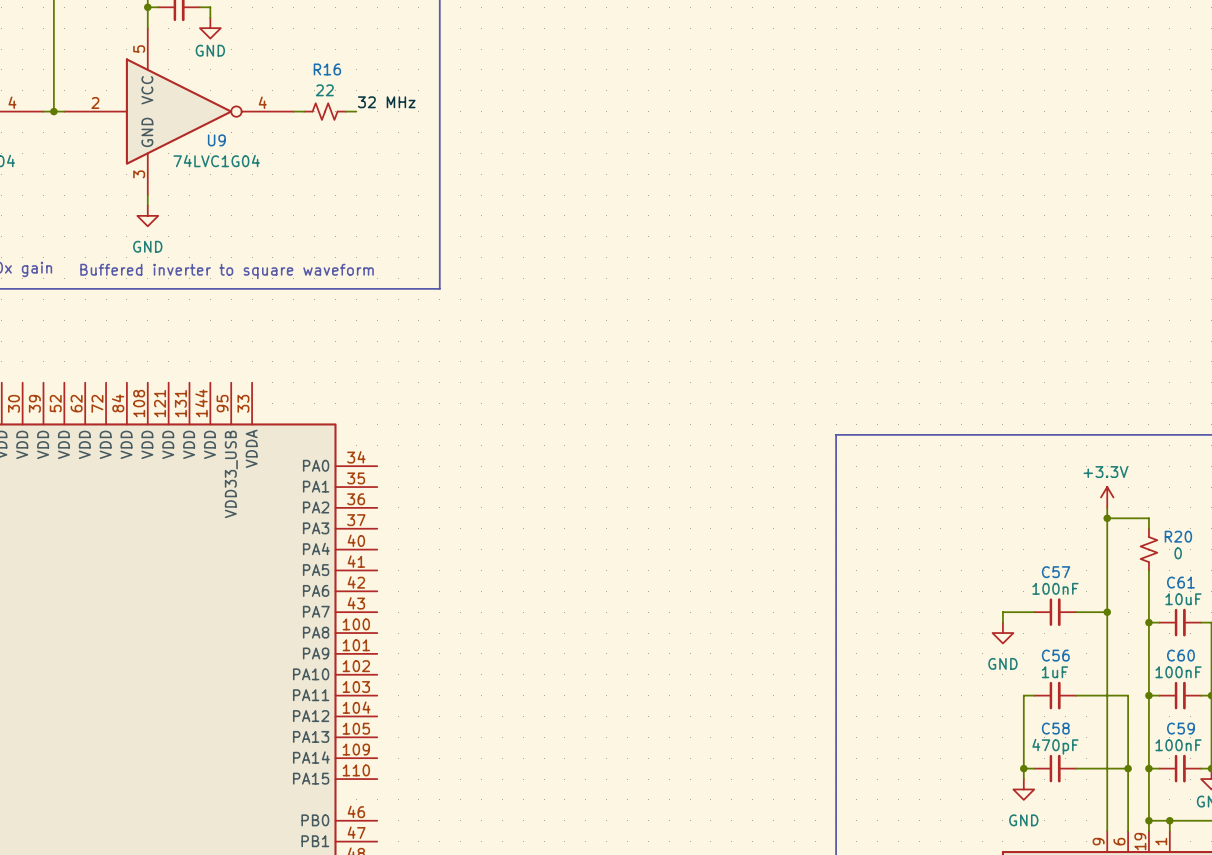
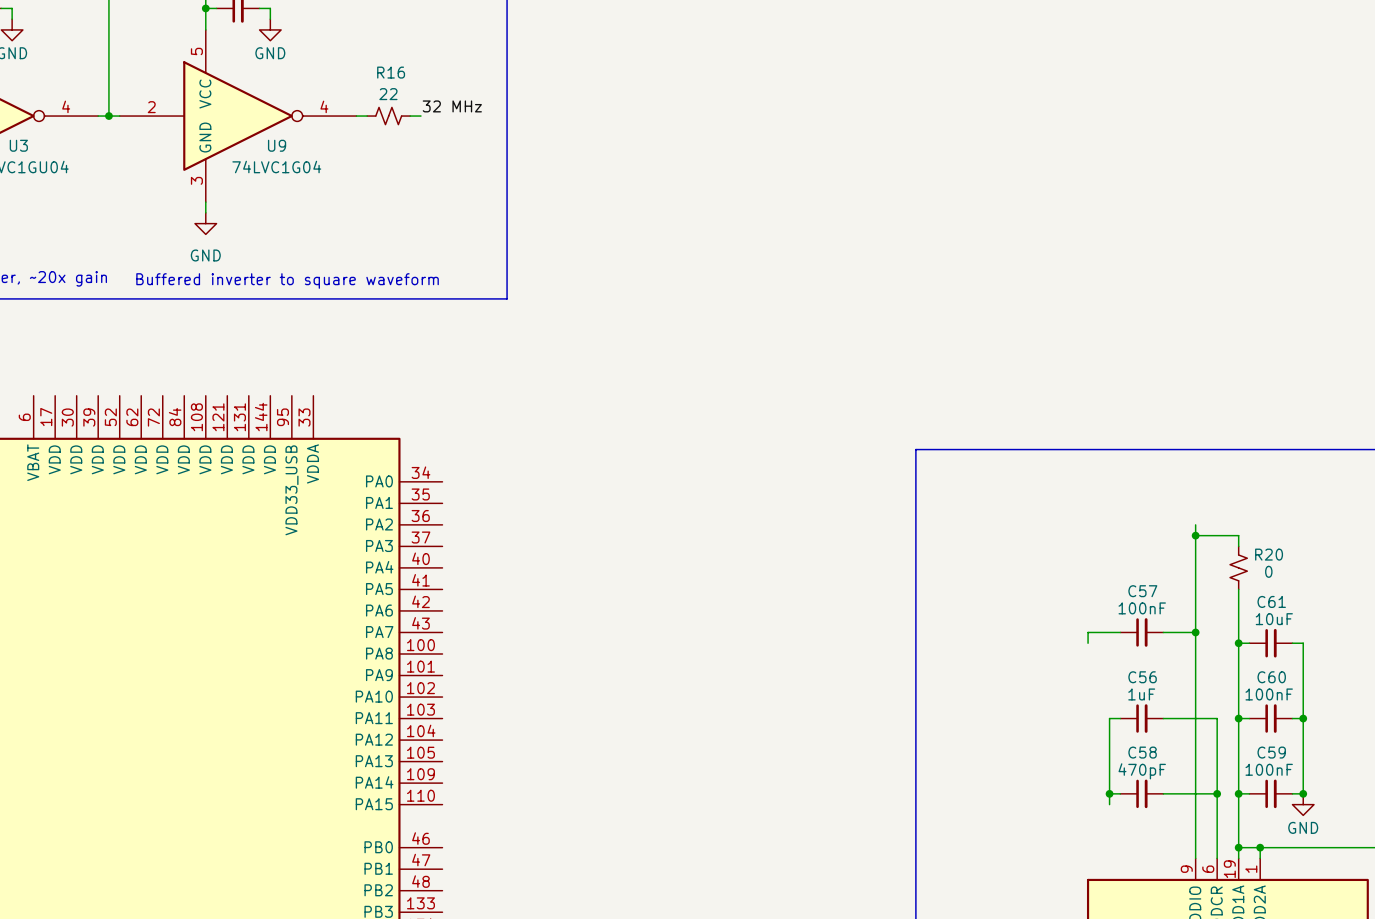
power symbol: +3.3V (1107, 497) -> none
power symbol: GND (1002, 633) -> none
power symbol: GND (1023, 789) -> none

